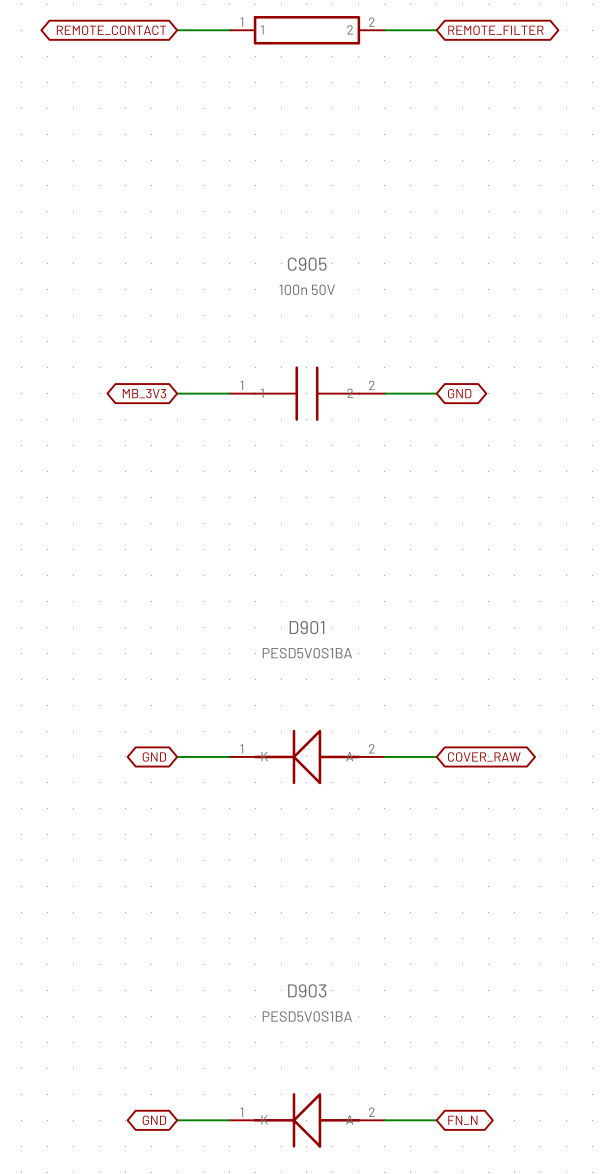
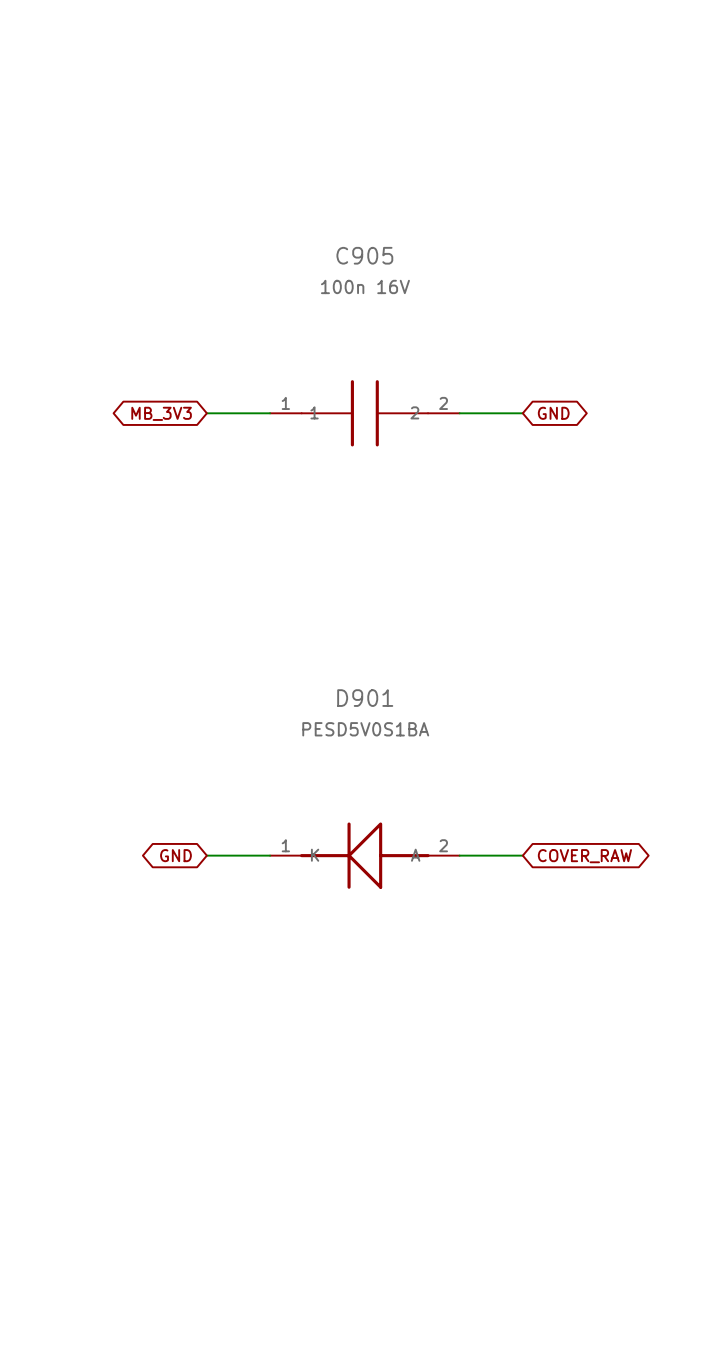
C905 value: 100n 50V (307, 289) -> 100n 16V (365, 286)
global label: GND (154, 1120) -> none
wire: (177, 1120) (229, 1120) -> none
D903: PESD5V0S1BA (306, 1120) -> none
wire: (384, 1120) (436, 1120) -> none
global label: FN_N (462, 1120) -> none

